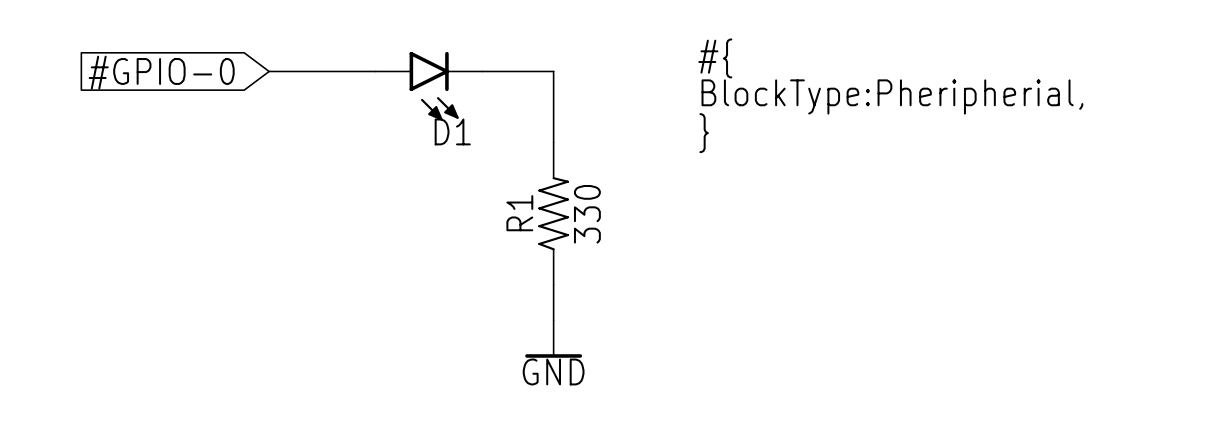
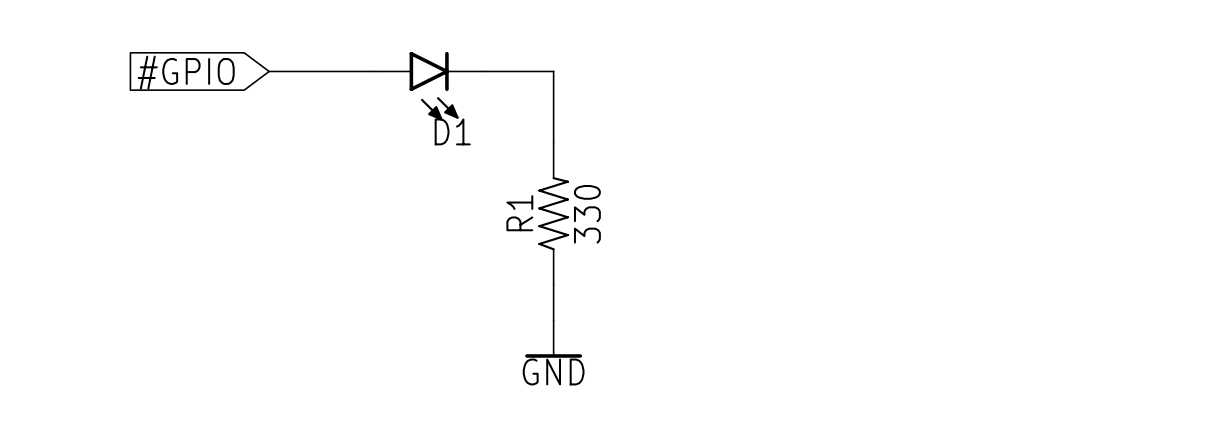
text: #{ (715, 58) -> none
global label: #GPIO-0 (161, 72) -> #GPIO (186, 72)
text: BlockType:Pheripherial, (892, 96) -> none
text: } (704, 133) -> none

